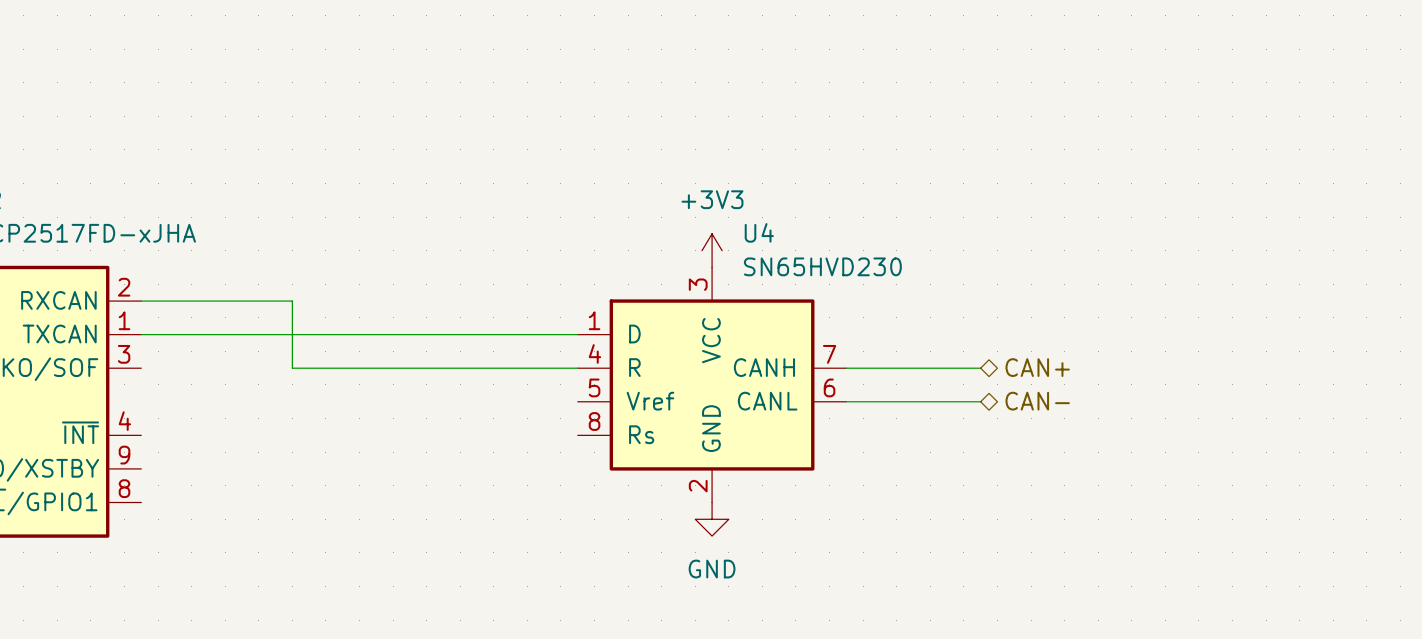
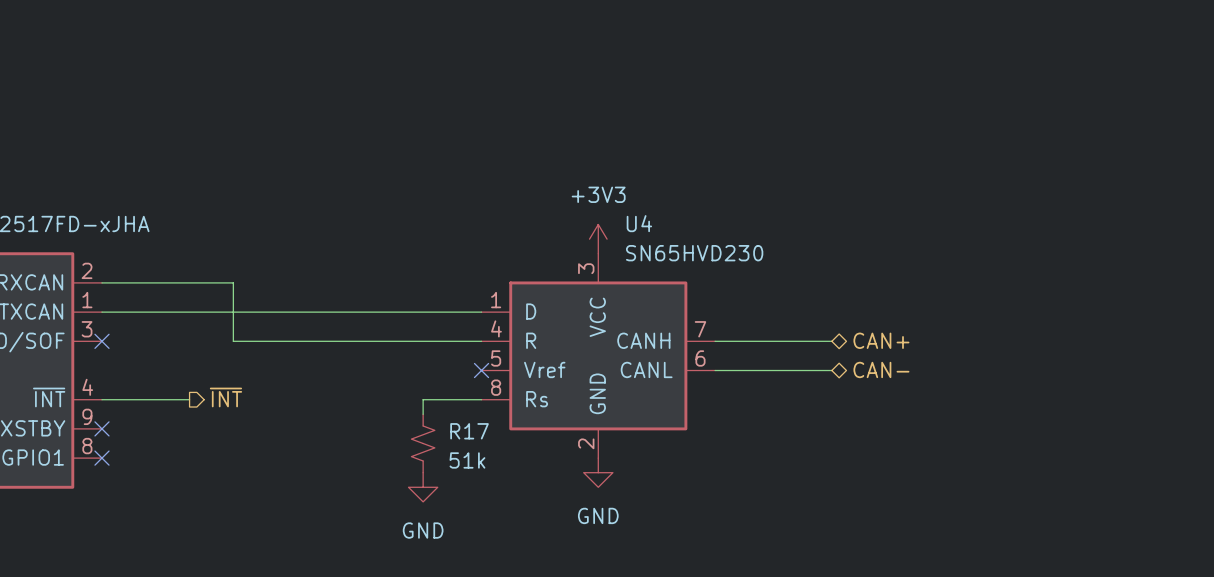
no-connect mark: none -> (101, 341)
no-connect mark: none -> (481, 370)
hierarchical label: none -> ~{INT} (225, 397)
wire: none -> (101, 399) (189, 399)
wire: none -> (481, 399) (423, 399) (423, 414)
no-connect mark: none -> (101, 428)
R17: none -> 51k (423, 443)
no-connect mark: none -> (101, 458)
power symbol: none -> GND (423, 487)

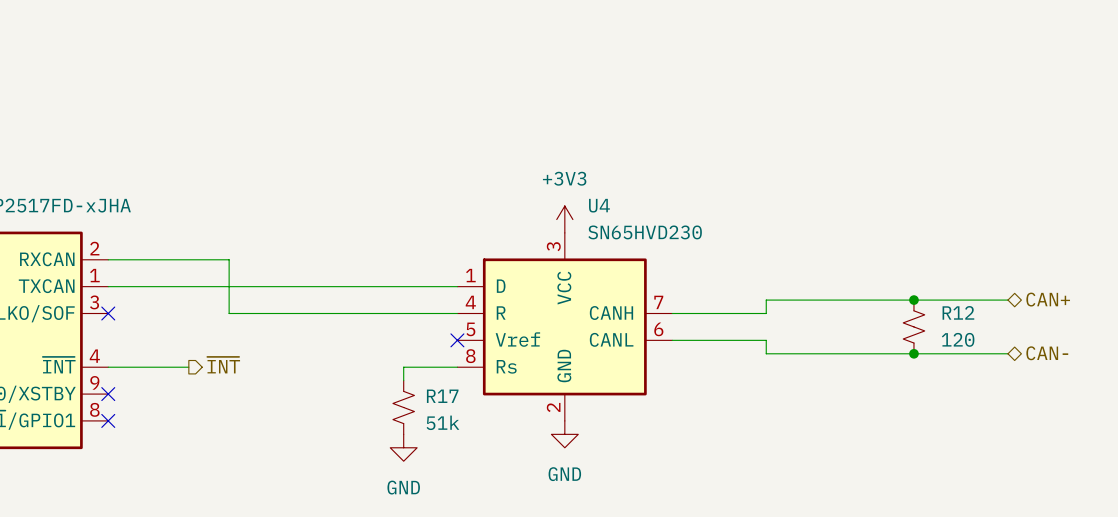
junction: none -> (913, 300)
hierarchical label position: CAN+ (881, 340) -> CAN+ (1048, 299)
wire: (817, 341) (831, 341) -> (766, 313) (766, 300) (1007, 300)
R12: none -> 120 (913, 326)
hierarchical label position: CAN- (881, 369) -> CAN- (1047, 353)
wire: (817, 370) (831, 370) -> (766, 340) (766, 353) (1007, 353)
junction: none -> (913, 353)

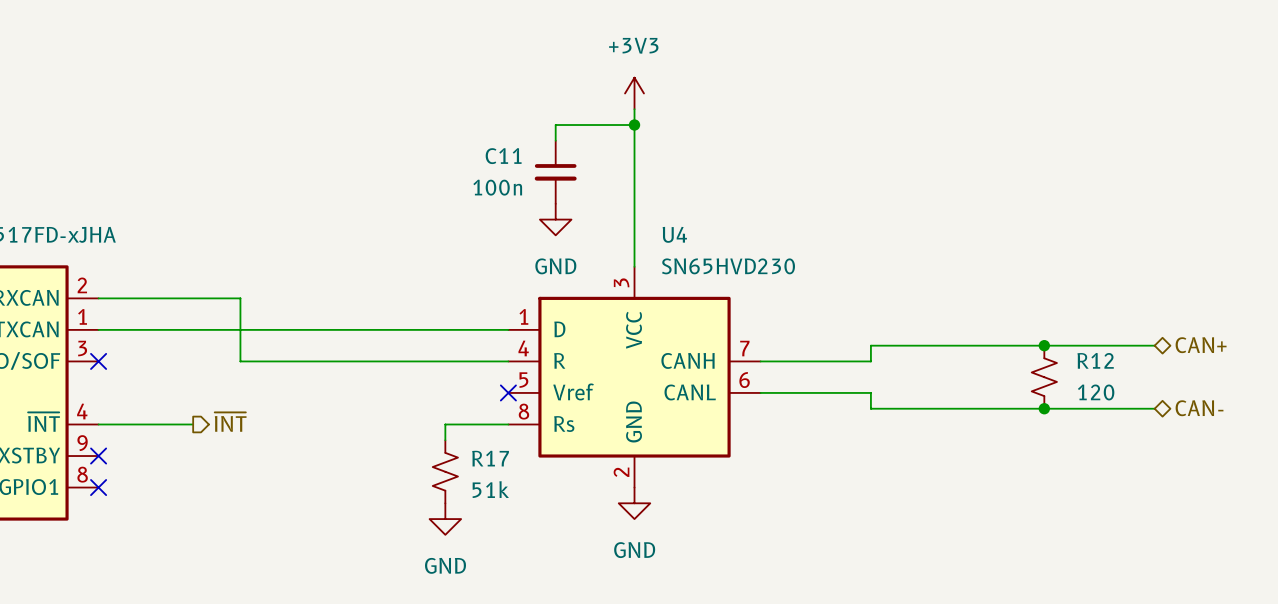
wire: none -> (634, 109) (634, 266)
wire: none -> (634, 125) (555, 125) (555, 140)
junction: none -> (634, 125)
C11: none -> 100n (555, 172)
power symbol: none -> GND (555, 219)
power symbol position: +3V3 (564, 219) -> +3V3 (634, 93)

